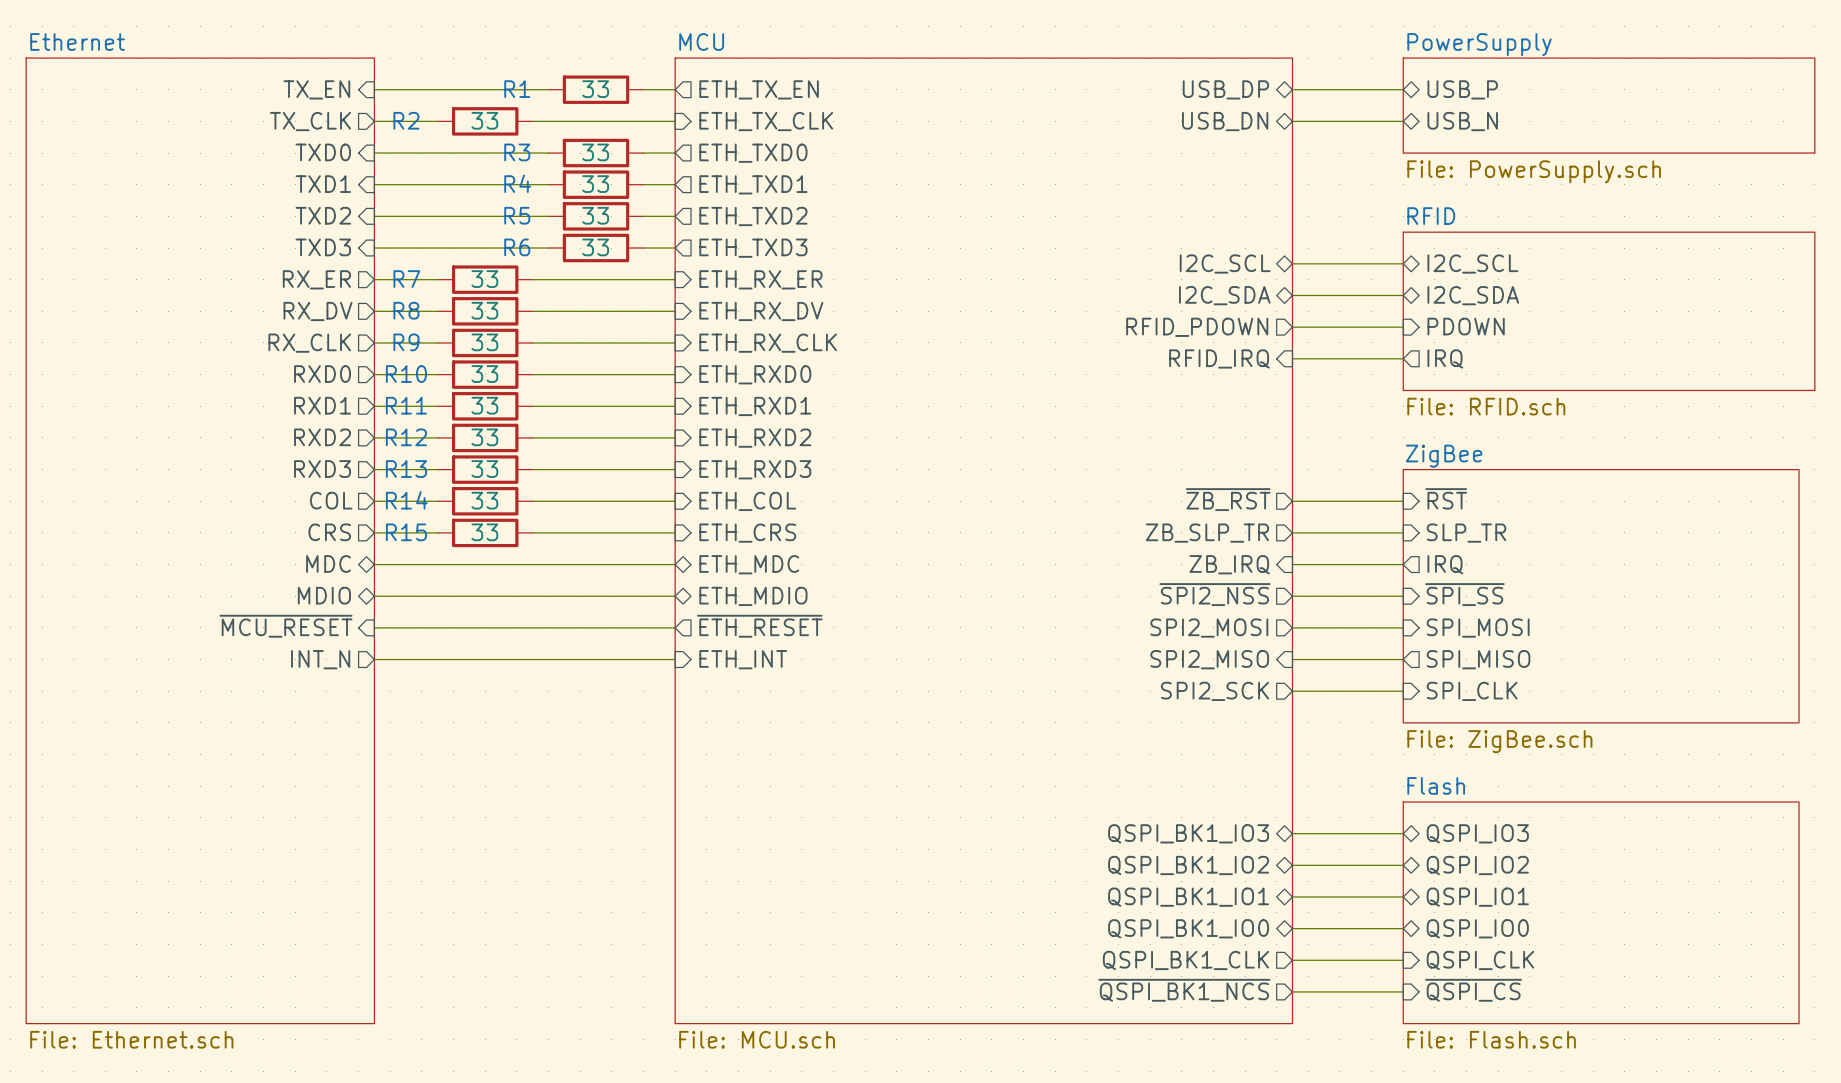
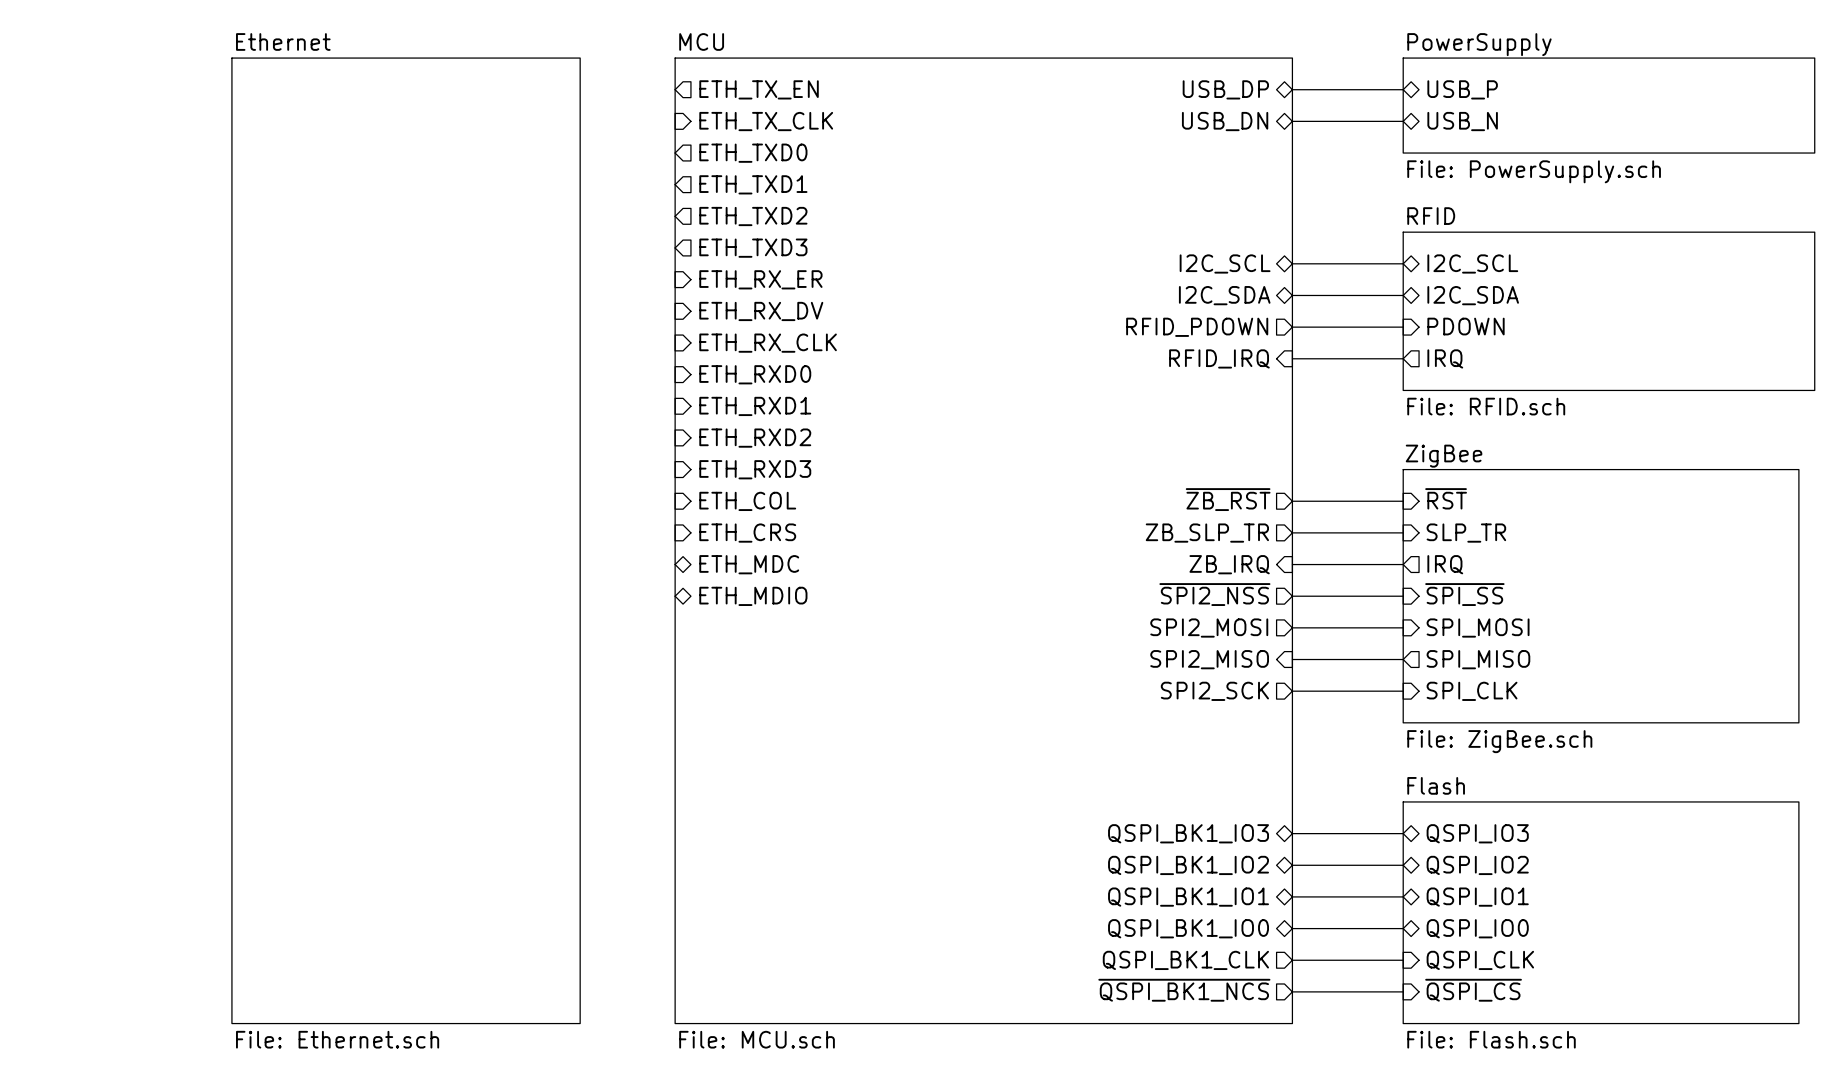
sheet pin: TX_EN (316, 89) -> none
wire: (374, 89) (548, 89) -> none
R1: 33 (596, 89) -> none
wire: (643, 89) (675, 89) -> none
sheet pin: TX_CLK (310, 121) -> none
wire: (374, 121) (437, 121) -> none
R2: 33 (485, 121) -> none
wire: (532, 121) (675, 121) -> none
sheet pin: TXD0 (323, 152) -> none
wire: (374, 153) (548, 153) -> none
R3: 33 (596, 153) -> none
wire: (643, 153) (675, 153) -> none
sheet pin: TXD1 (323, 184) -> none
wire: (374, 184) (548, 184) -> none
R4: 33 (596, 184) -> none
wire: (643, 184) (675, 184) -> none
sheet pin: TXD2 (323, 215) -> none
wire: (374, 216) (548, 216) -> none
R5: 33 (596, 216) -> none
wire: (643, 216) (675, 216) -> none
sheet pin: TXD3 (323, 247) -> none
wire: (374, 248) (548, 248) -> none
R6: 33 (596, 248) -> none
wire: (643, 248) (675, 248) -> none
sheet pin: RX_ER (316, 279) -> none
wire: (374, 279) (437, 279) -> none
R7: 33 (485, 279) -> none
wire: (532, 279) (675, 279) -> none
sheet pin: RX_DV (318, 311) -> none
wire: (374, 311) (437, 311) -> none
R8: 33 (485, 311) -> none
wire: (532, 311) (675, 311) -> none
wire: (374, 342) (437, 342) -> none
R9: 33 (485, 342) -> none
wire: (532, 342) (675, 342) -> none
sheet pin: RX_CLK (309, 343) -> none
sheet pin: RXD0 (322, 374) -> none
wire: (374, 374) (437, 374) -> none
R10: 33 (485, 374) -> none
wire: (532, 374) (675, 374) -> none
sheet pin: RXD1 (322, 405) -> none
wire: (374, 406) (437, 406) -> none
R11: 33 (485, 406) -> none
wire: (532, 406) (675, 406) -> none
sheet pin: RXD2 (322, 437) -> none
wire: (374, 437) (437, 437) -> none
R12: 33 (485, 437) -> none
wire: (532, 437) (675, 437) -> none
sheet pin: RXD3 (322, 469) -> none
wire: (374, 469) (437, 469) -> none
R13: 33 (485, 469) -> none
wire: (532, 469) (675, 469) -> none
sheet pin: COL (331, 500) -> none
wire: (374, 501) (437, 501) -> none
R14: 33 (485, 501) -> none
wire: (532, 501) (675, 501) -> none
sheet pin: CRS (329, 532) -> none
wire: (374, 532) (437, 532) -> none
R15: 33 (485, 532) -> none
wire: (532, 532) (675, 532) -> none
sheet Ethernet position: (200, 540) -> (406, 540)
sheet pin: MDC (328, 563) -> none
wire: (374, 564) (675, 564) -> none
sheet pin: MDIO (324, 595) -> none
wire: (374, 596) (675, 596) -> none
sheet pin: ~{MCU_RESET} (286, 626) -> none
sheet pin: ~{ETH_RESET} (759, 626) -> none
wire: (374, 627) (675, 627) -> none
sheet pin: INT_N (320, 659) -> none
wire: (374, 659) (675, 659) -> none
sheet pin: ETH_INT (743, 659) -> none

